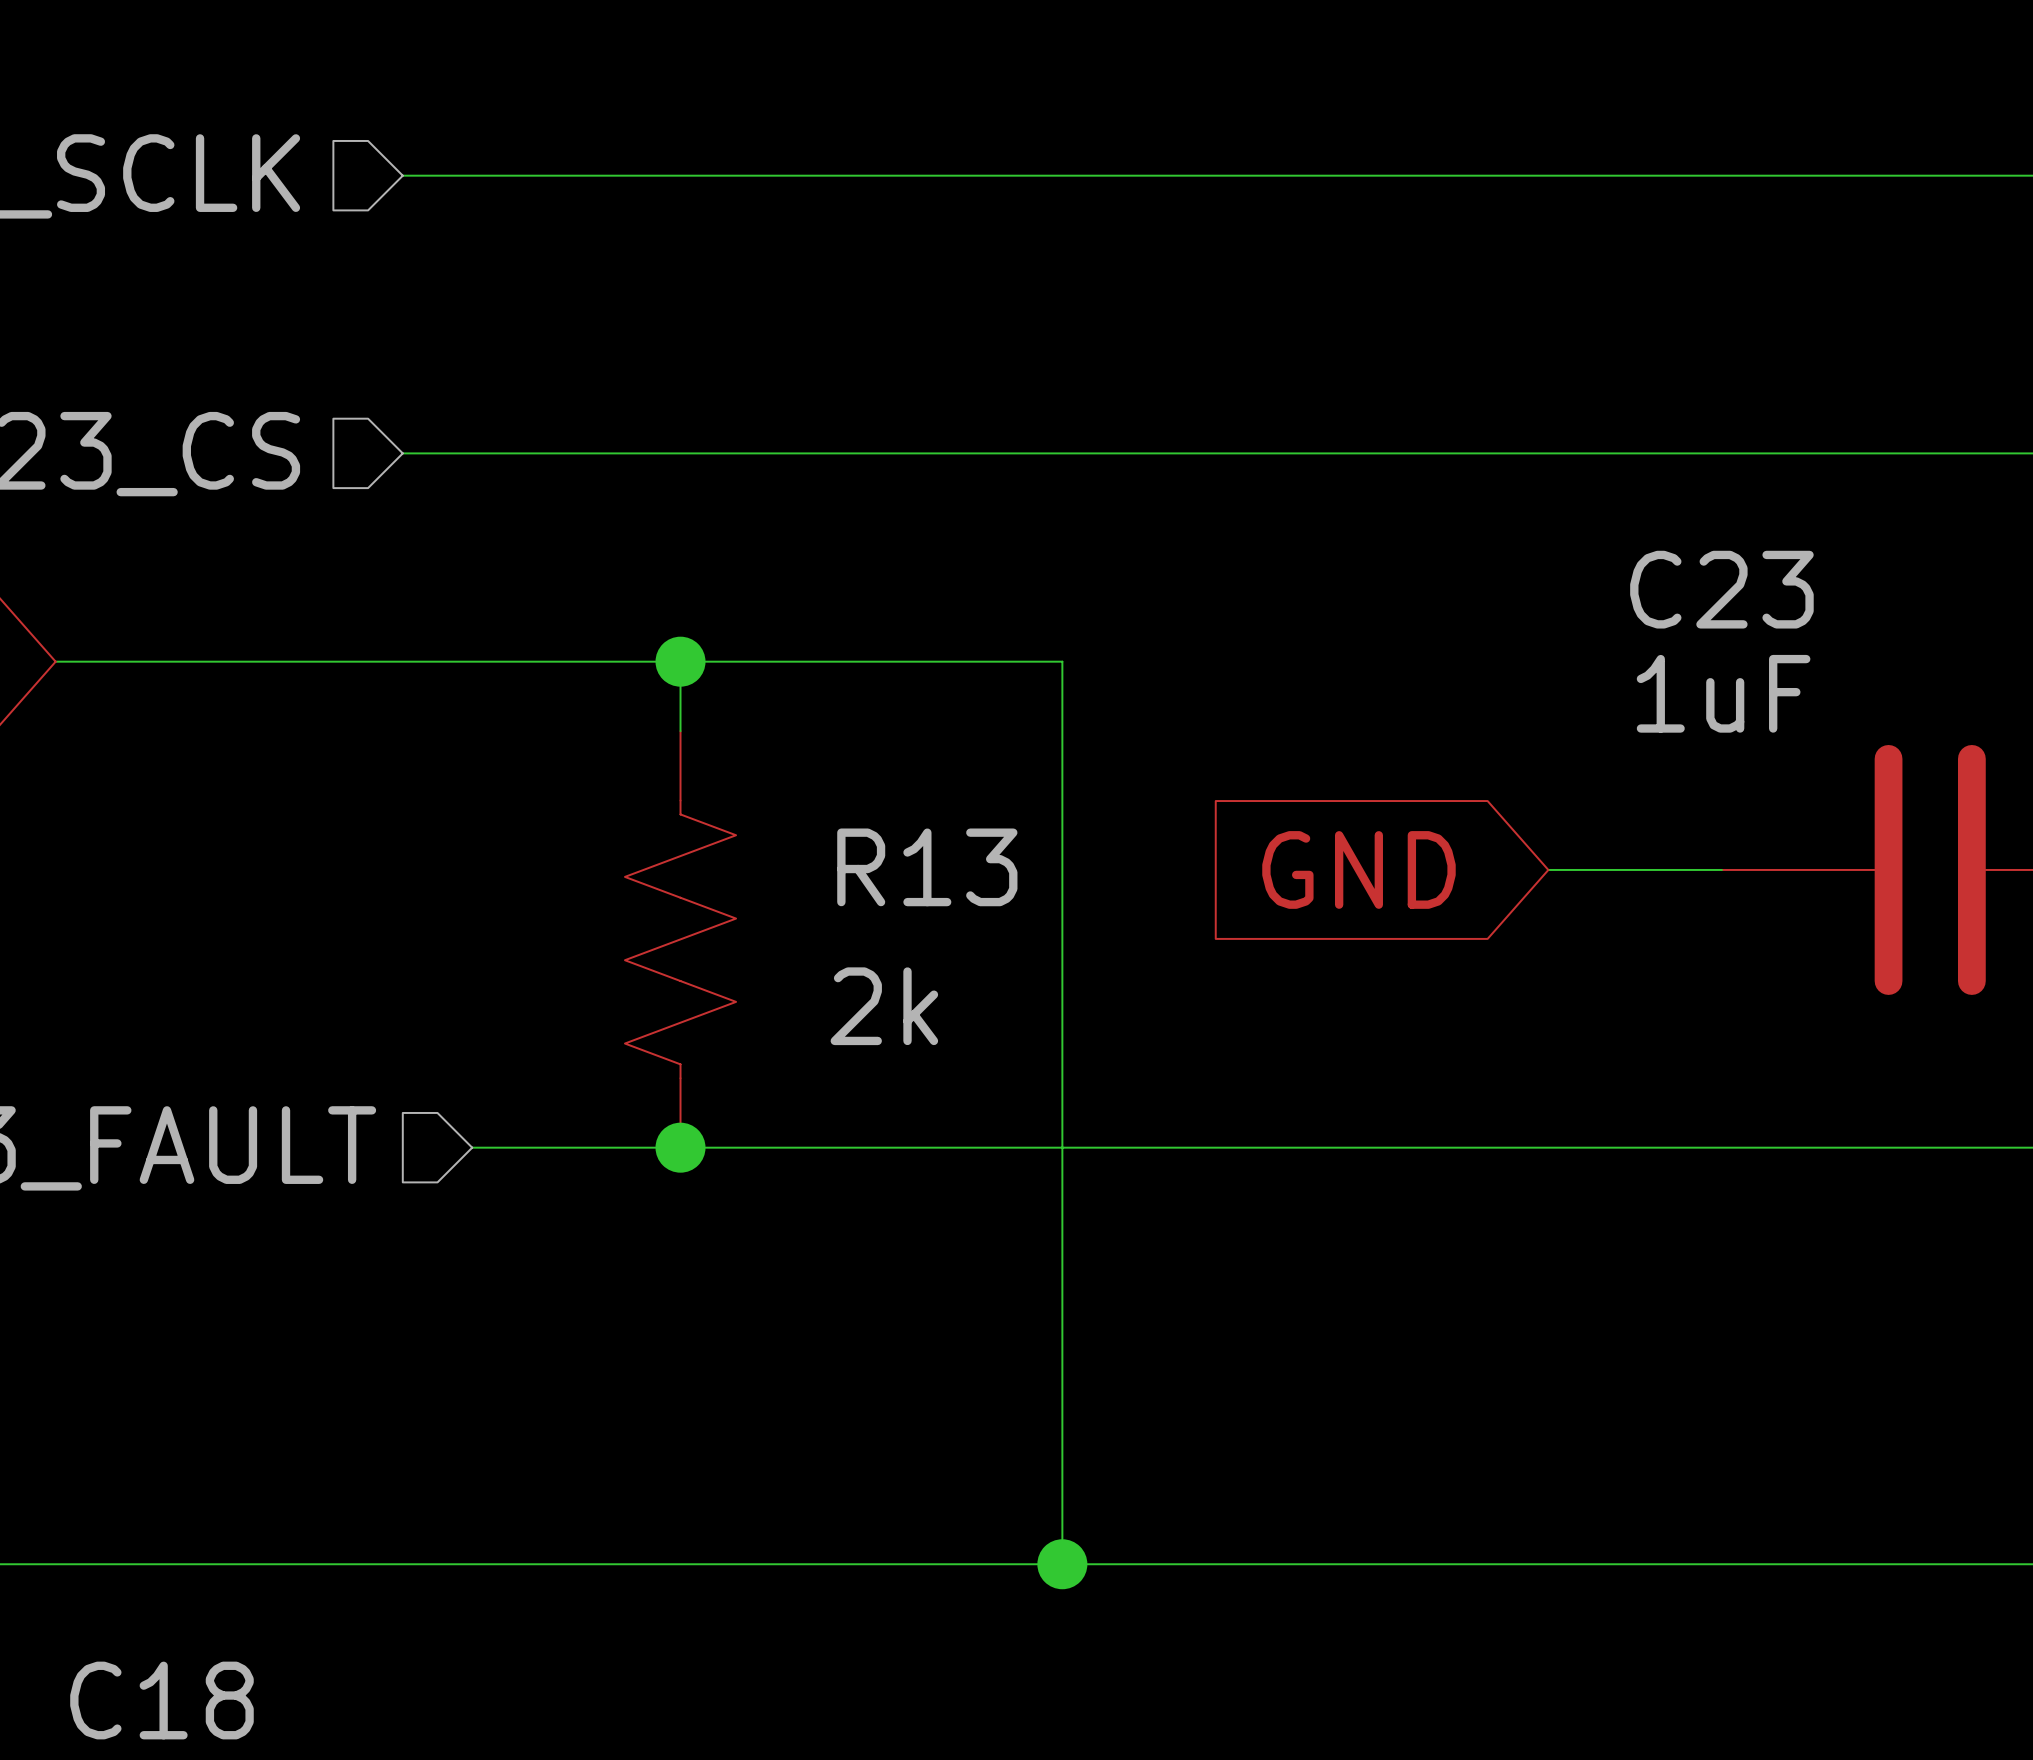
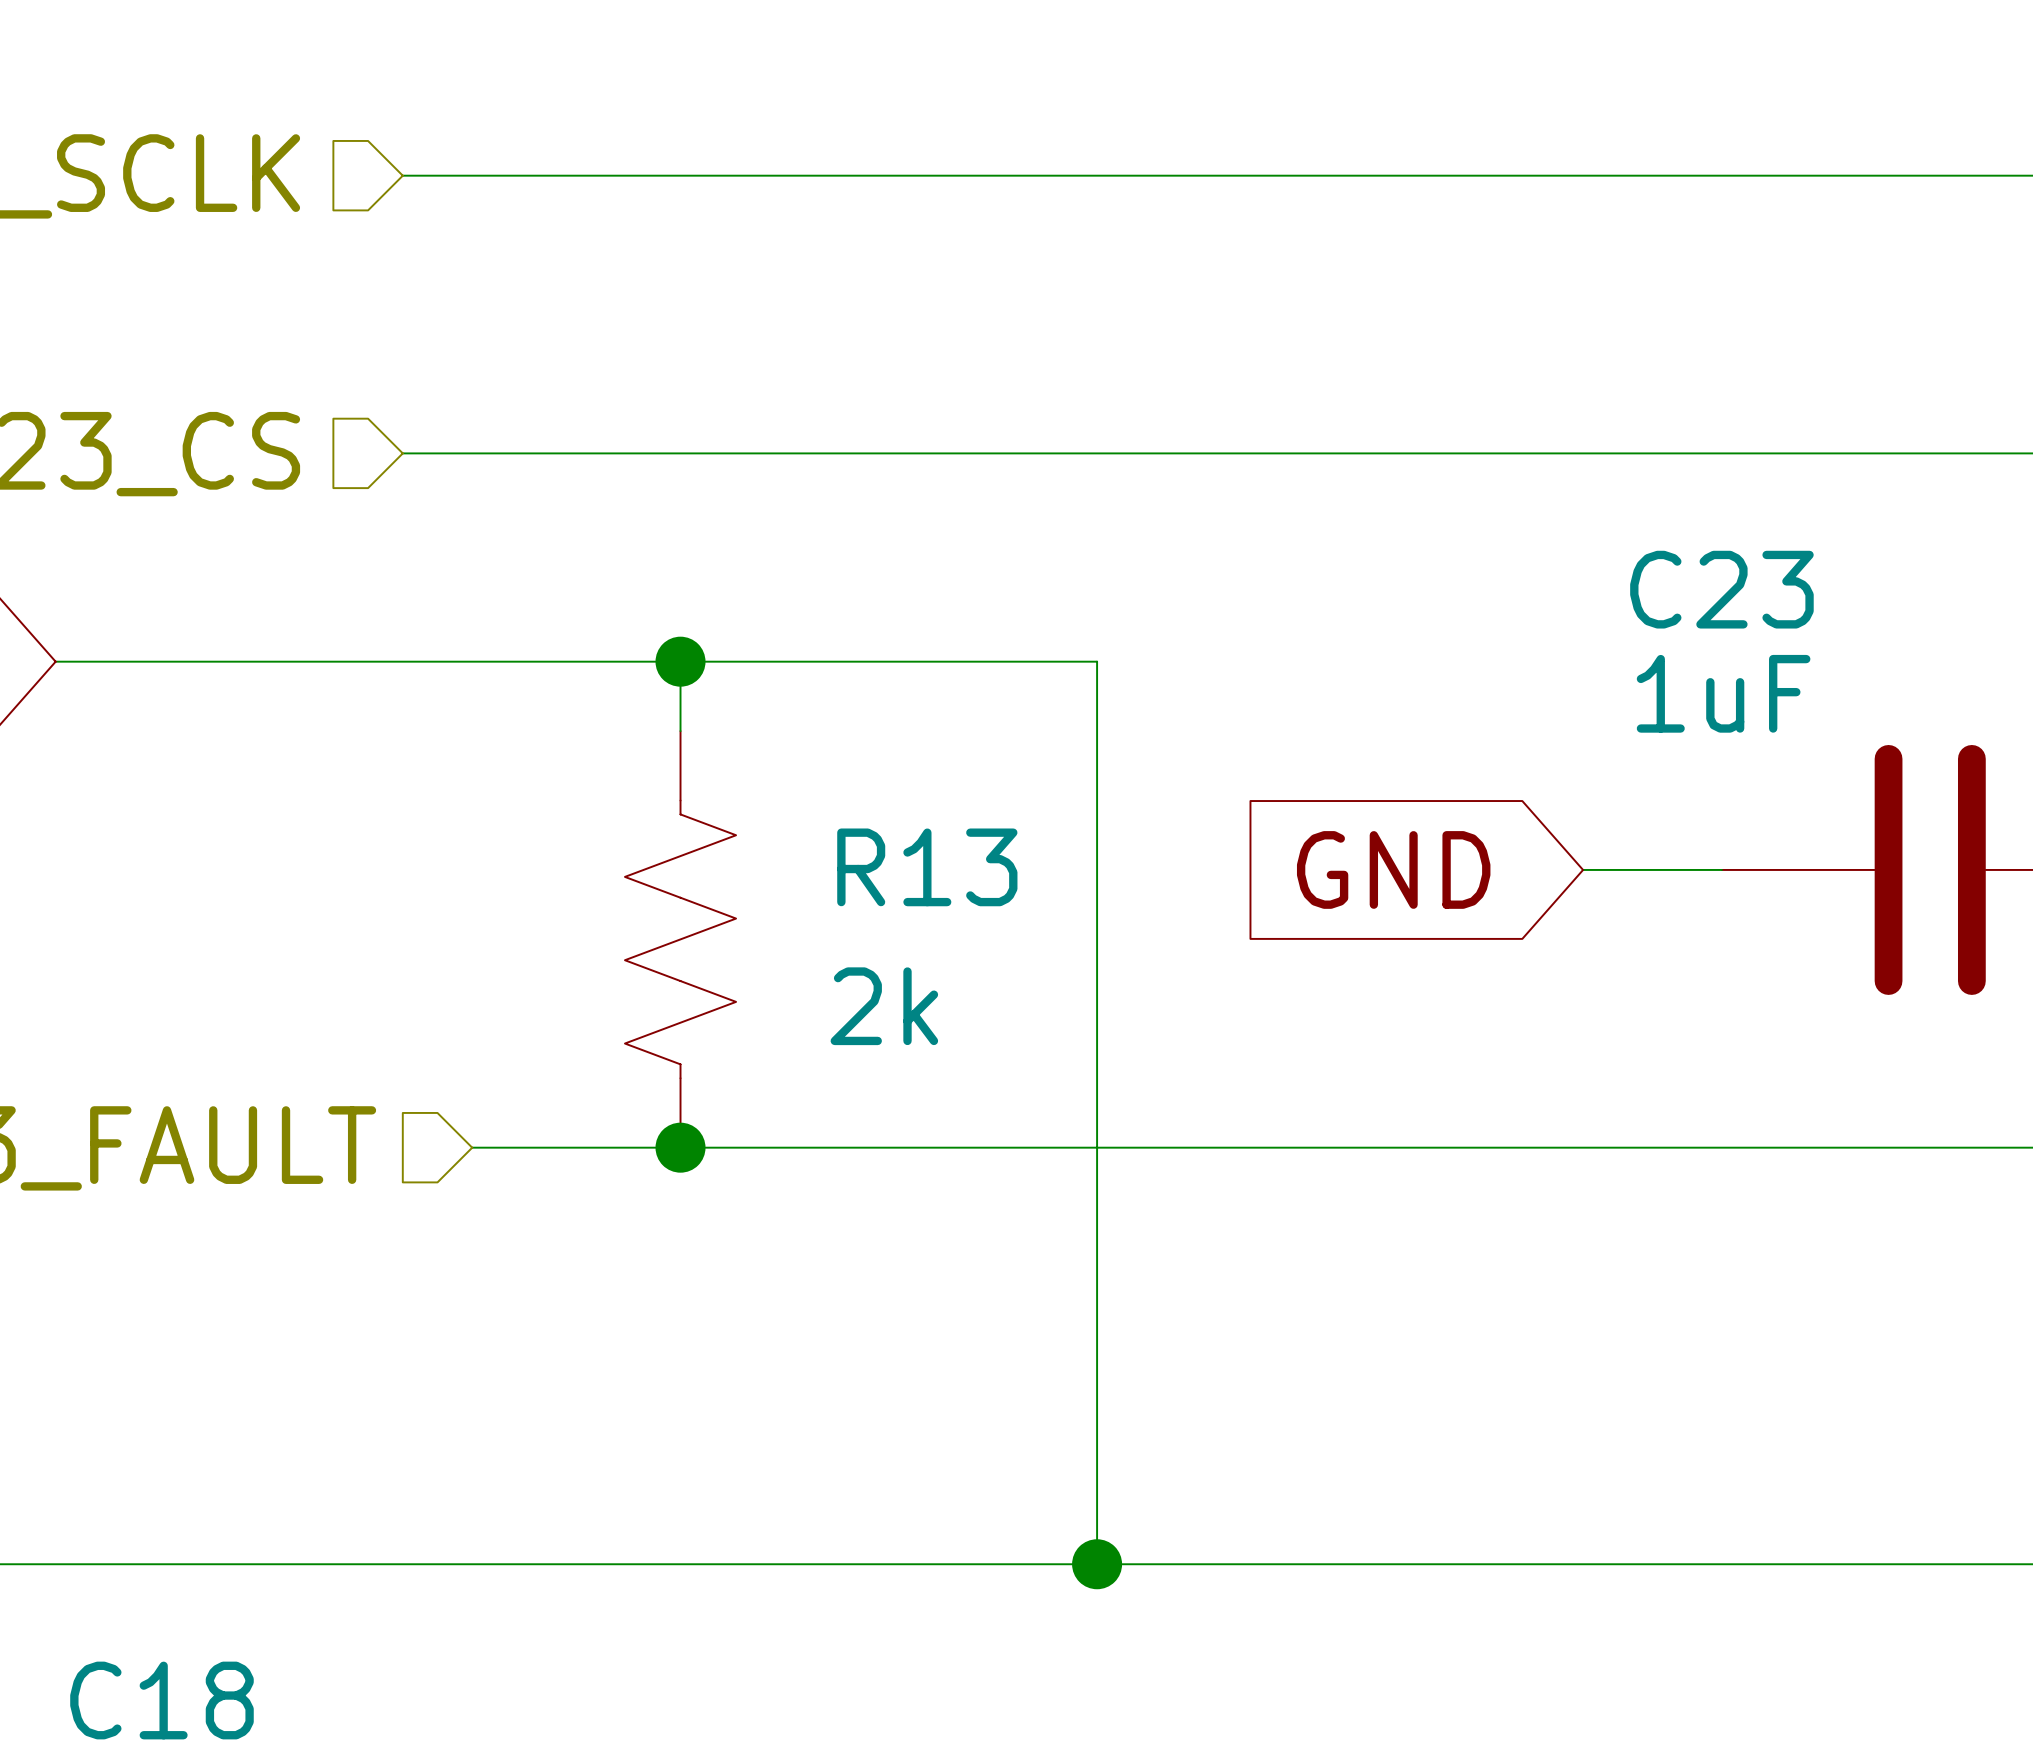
wire: (1062, 661) (1062, 1564) -> (1062, 661) (1097, 661) (1097, 1564)
global label position: GND (1358, 869) -> GND (1393, 869)
wire: (1548, 869) (1583, 869) -> none
junction position: (1062, 1564) -> (1097, 1564)

